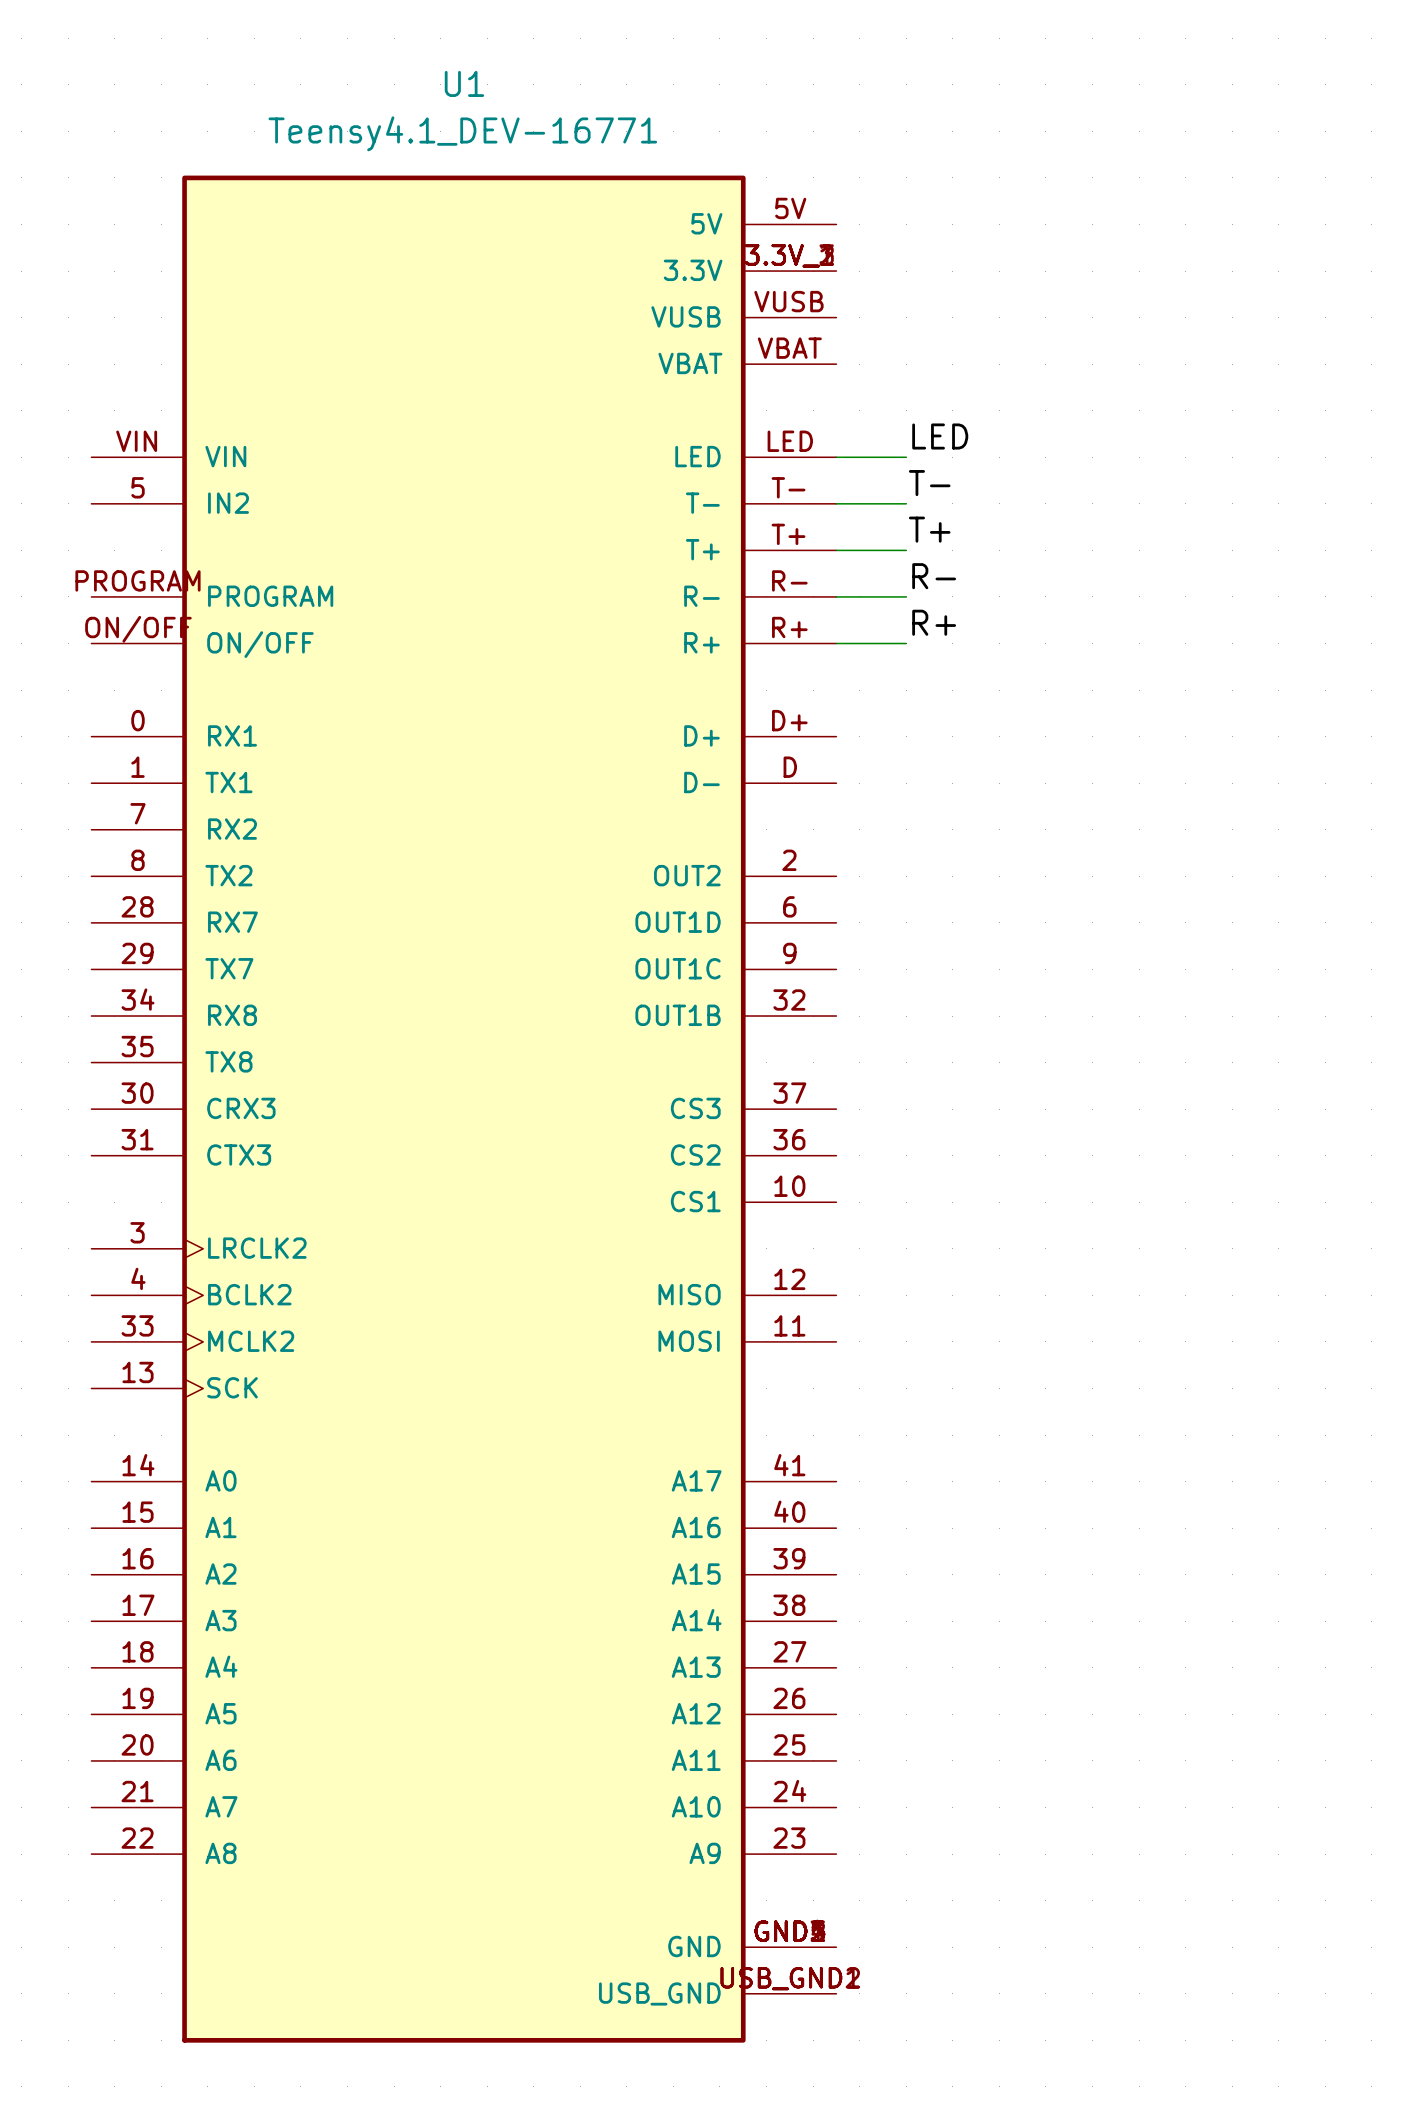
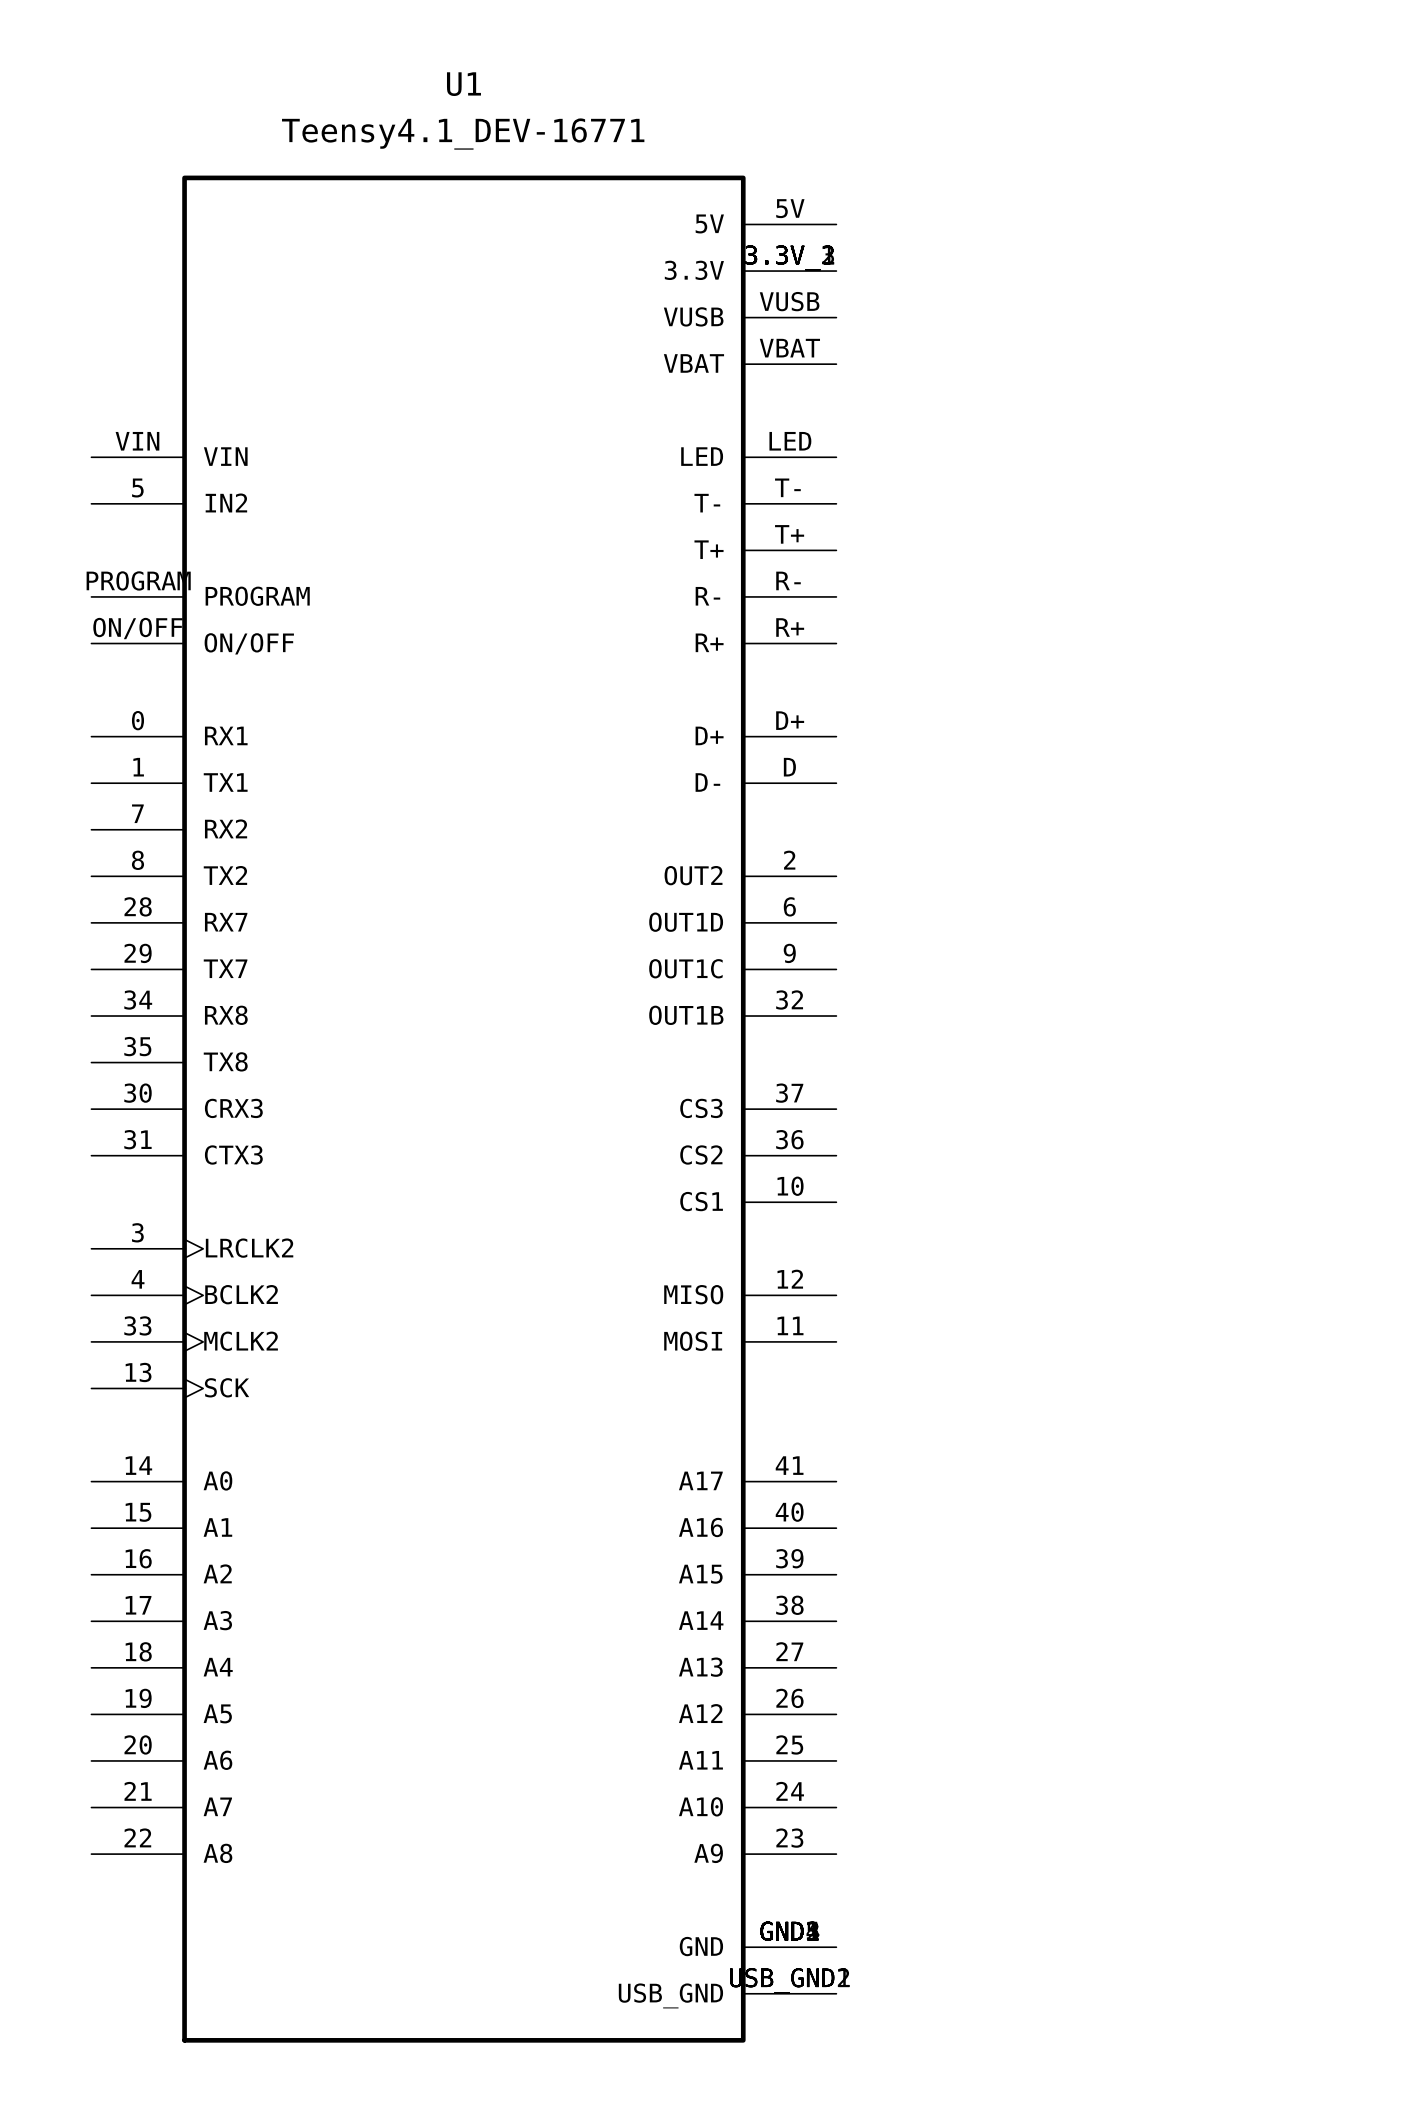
label: LED (940, 436) -> none
wire: (836, 457) (906, 457) -> none
label: T- (929, 483) -> none
wire: (836, 503) (906, 503) -> none
label: T+ (929, 529) -> none
wire: (836, 550) (906, 550) -> none
label: R- (934, 576) -> none
wire: (836, 596) (906, 596) -> none
label: R+ (934, 622) -> none
wire: (836, 643) (906, 643) -> none

